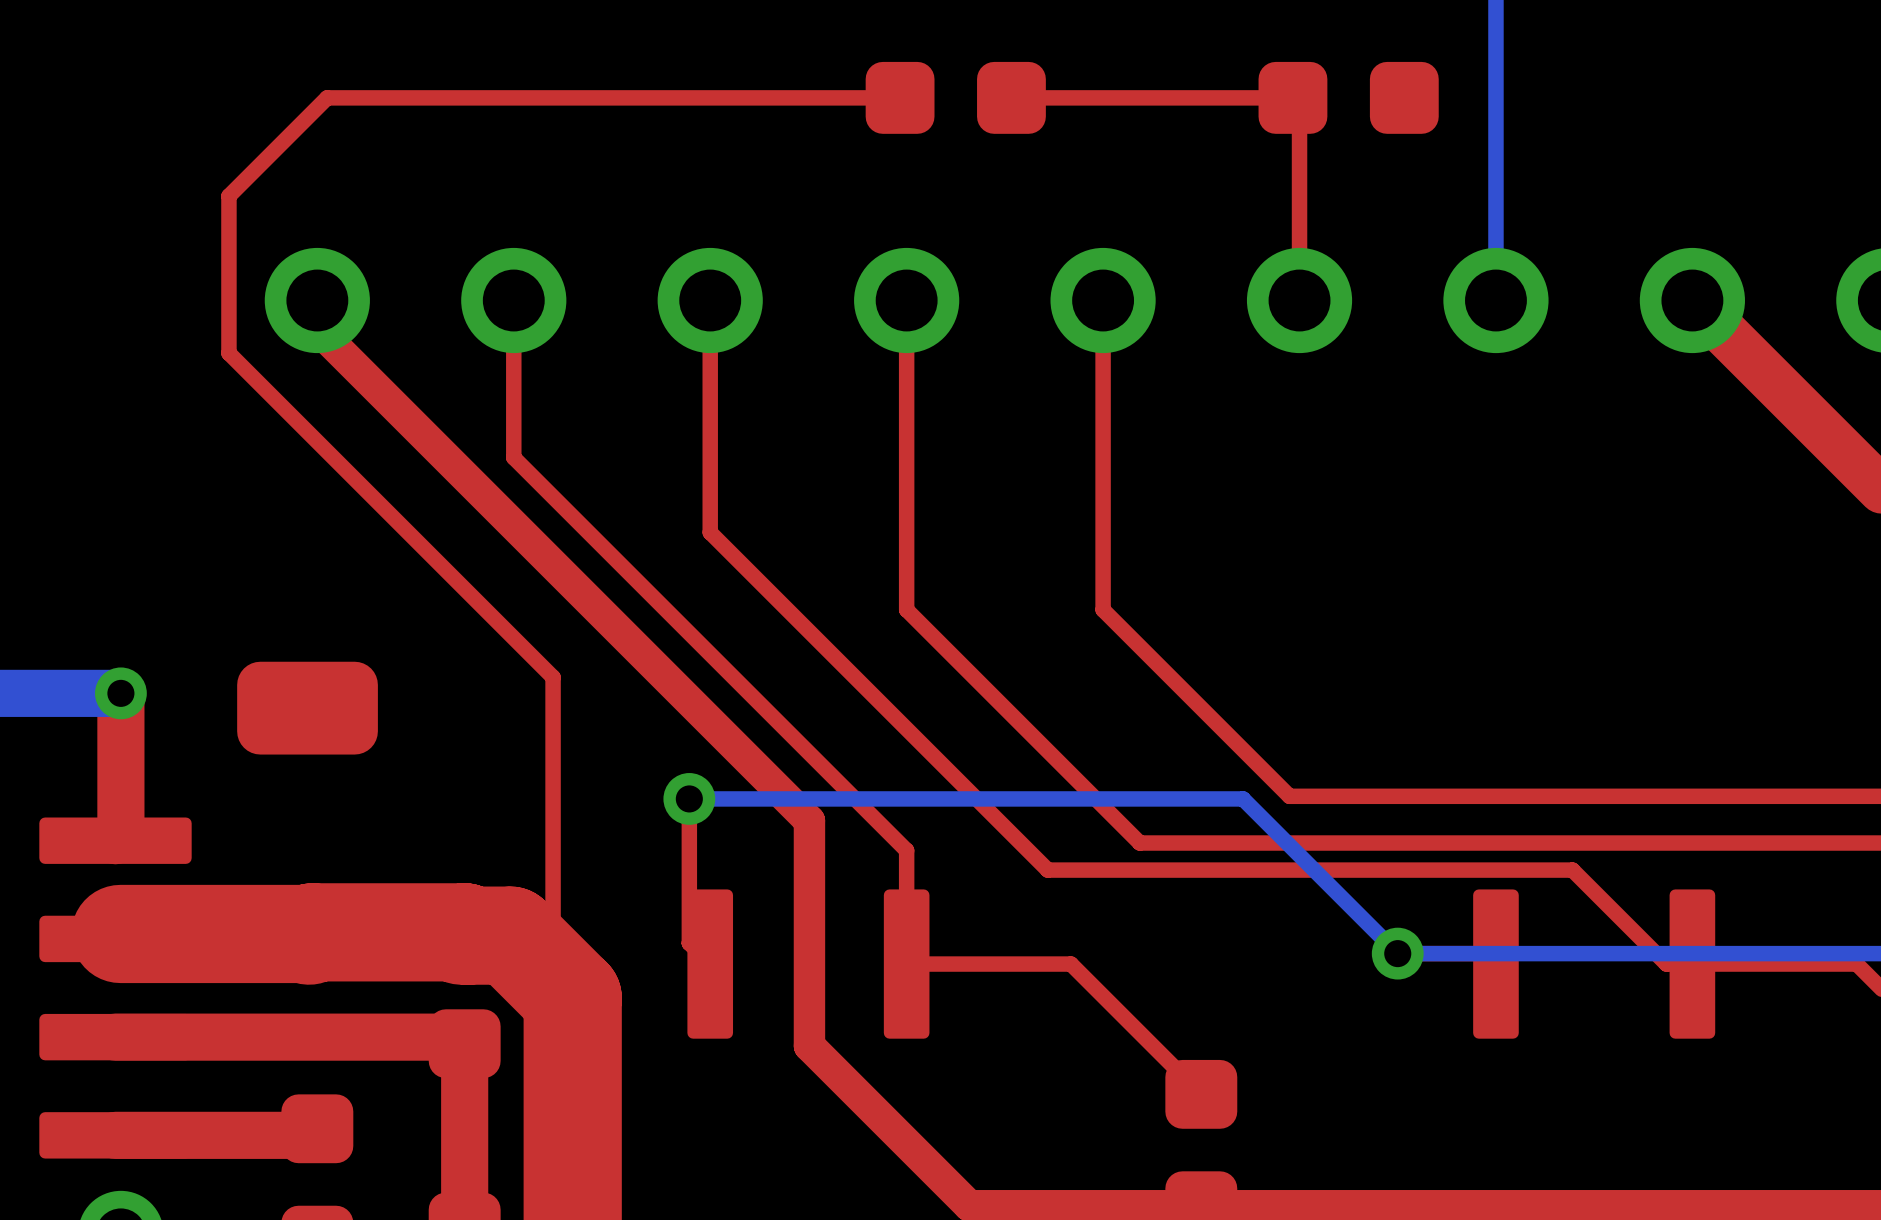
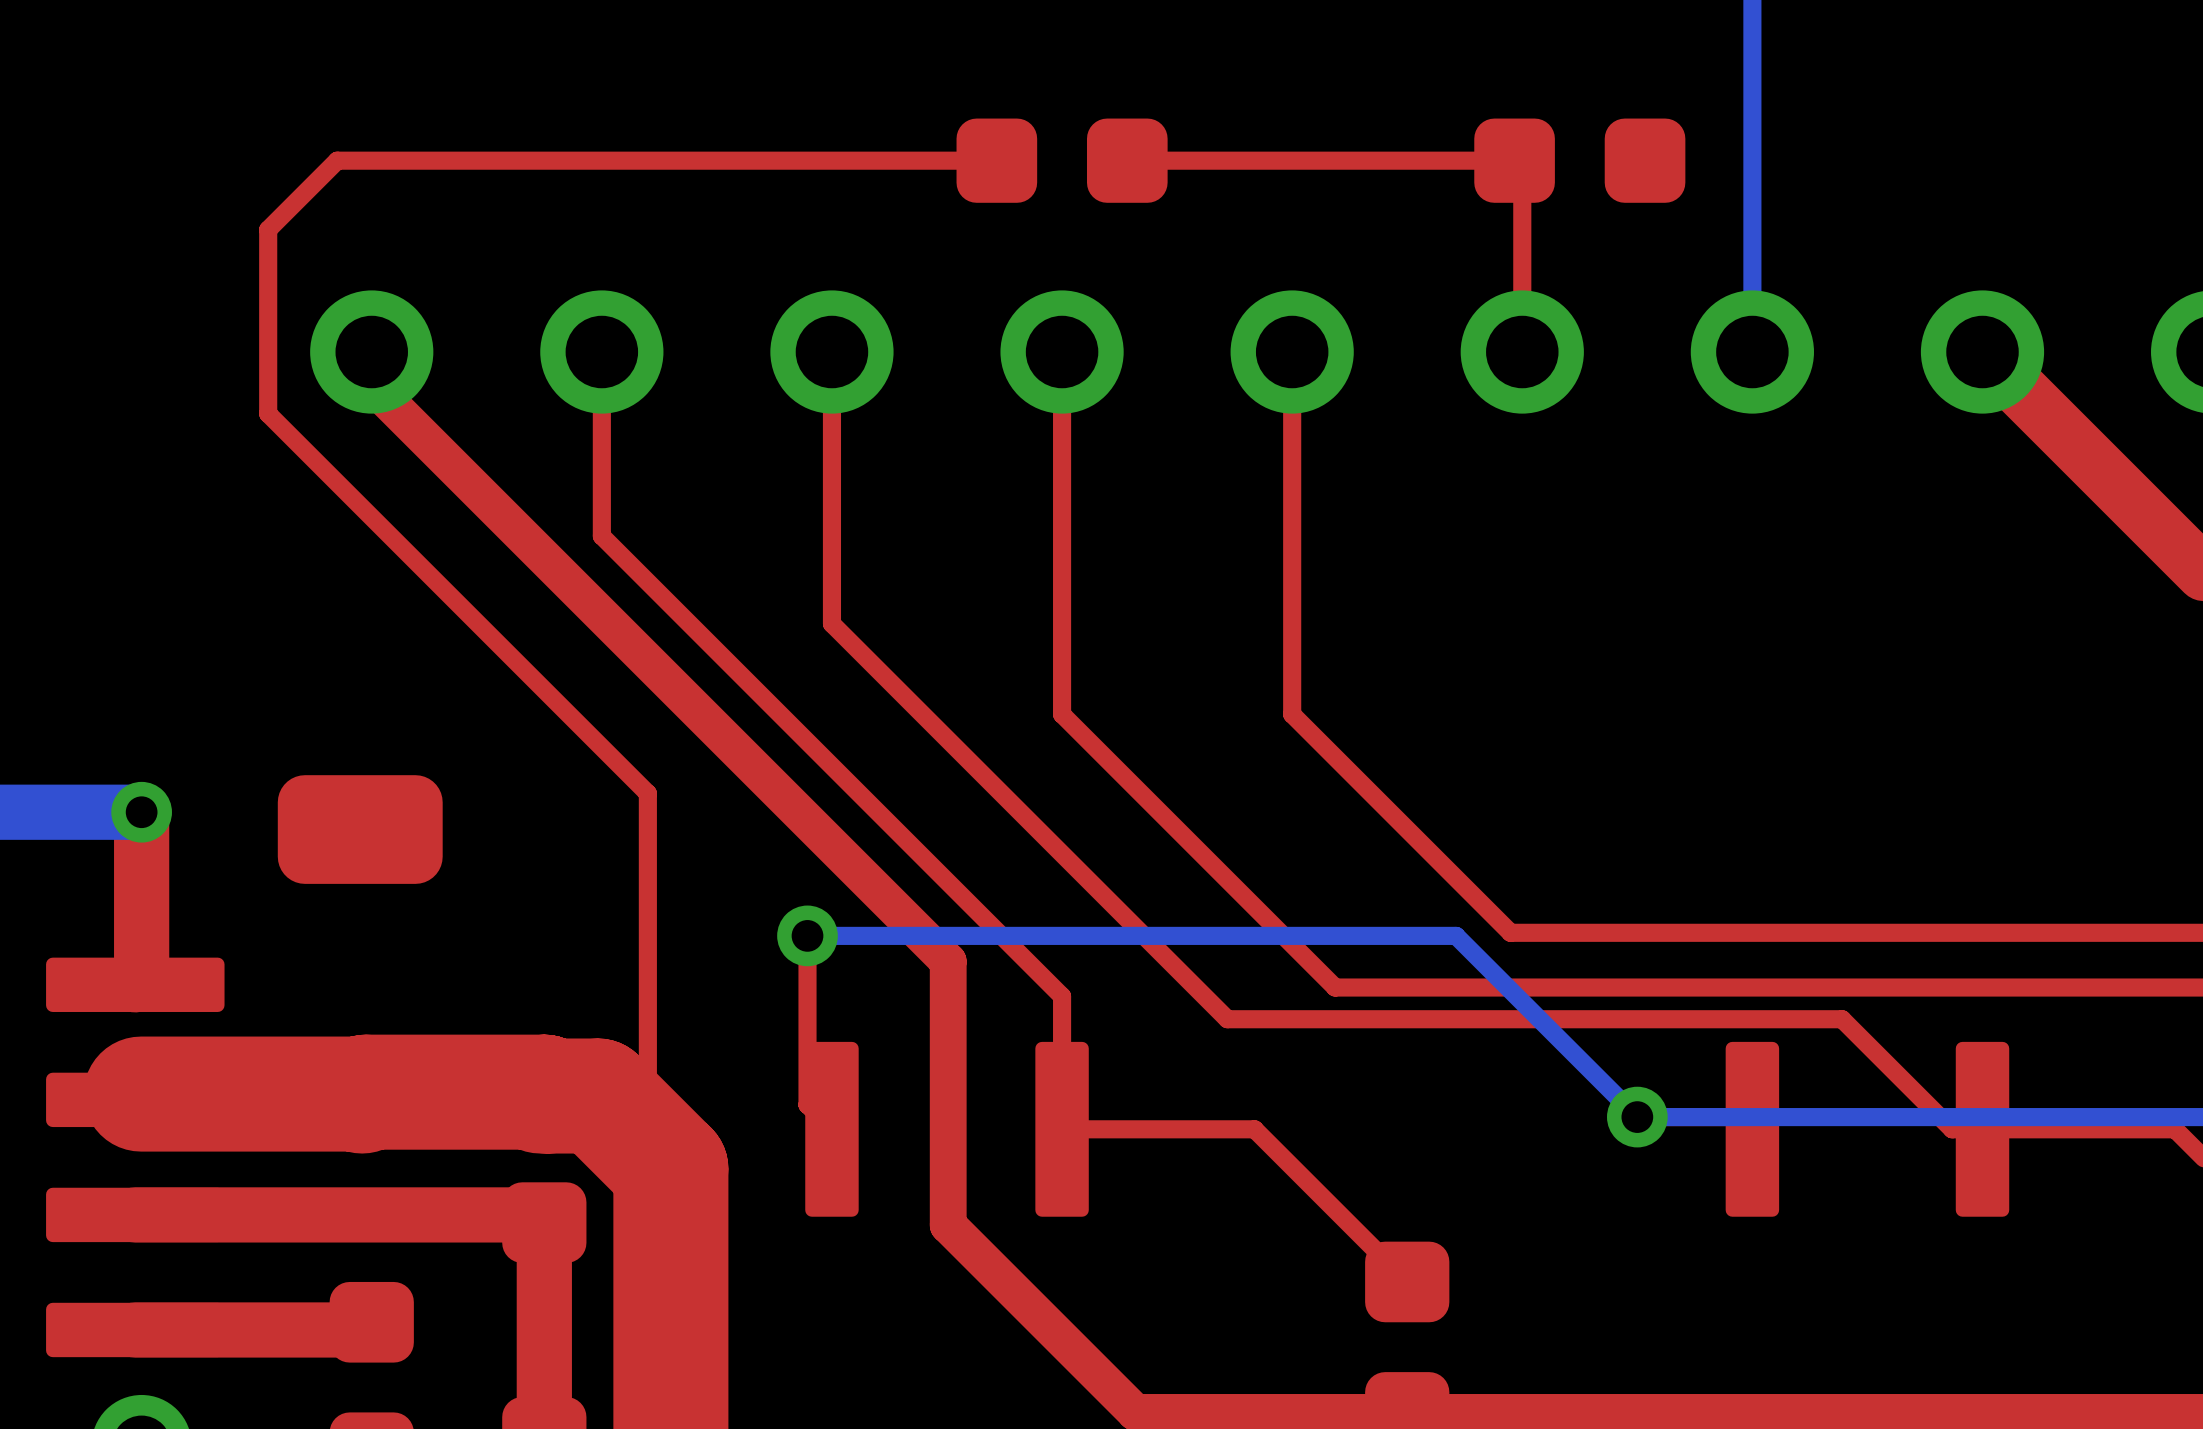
top track: (900, 97) (327, 97) (287, 137) -> (996, 160) (337, 160)
part position: (955, 97) -> (1062, 160)
top track: (1011, 97) (1292, 97) (1299, 104) (1299, 143) -> (1127, 160) (1514, 160) (1522, 168)
part position: (1348, 97) -> (1579, 160)

